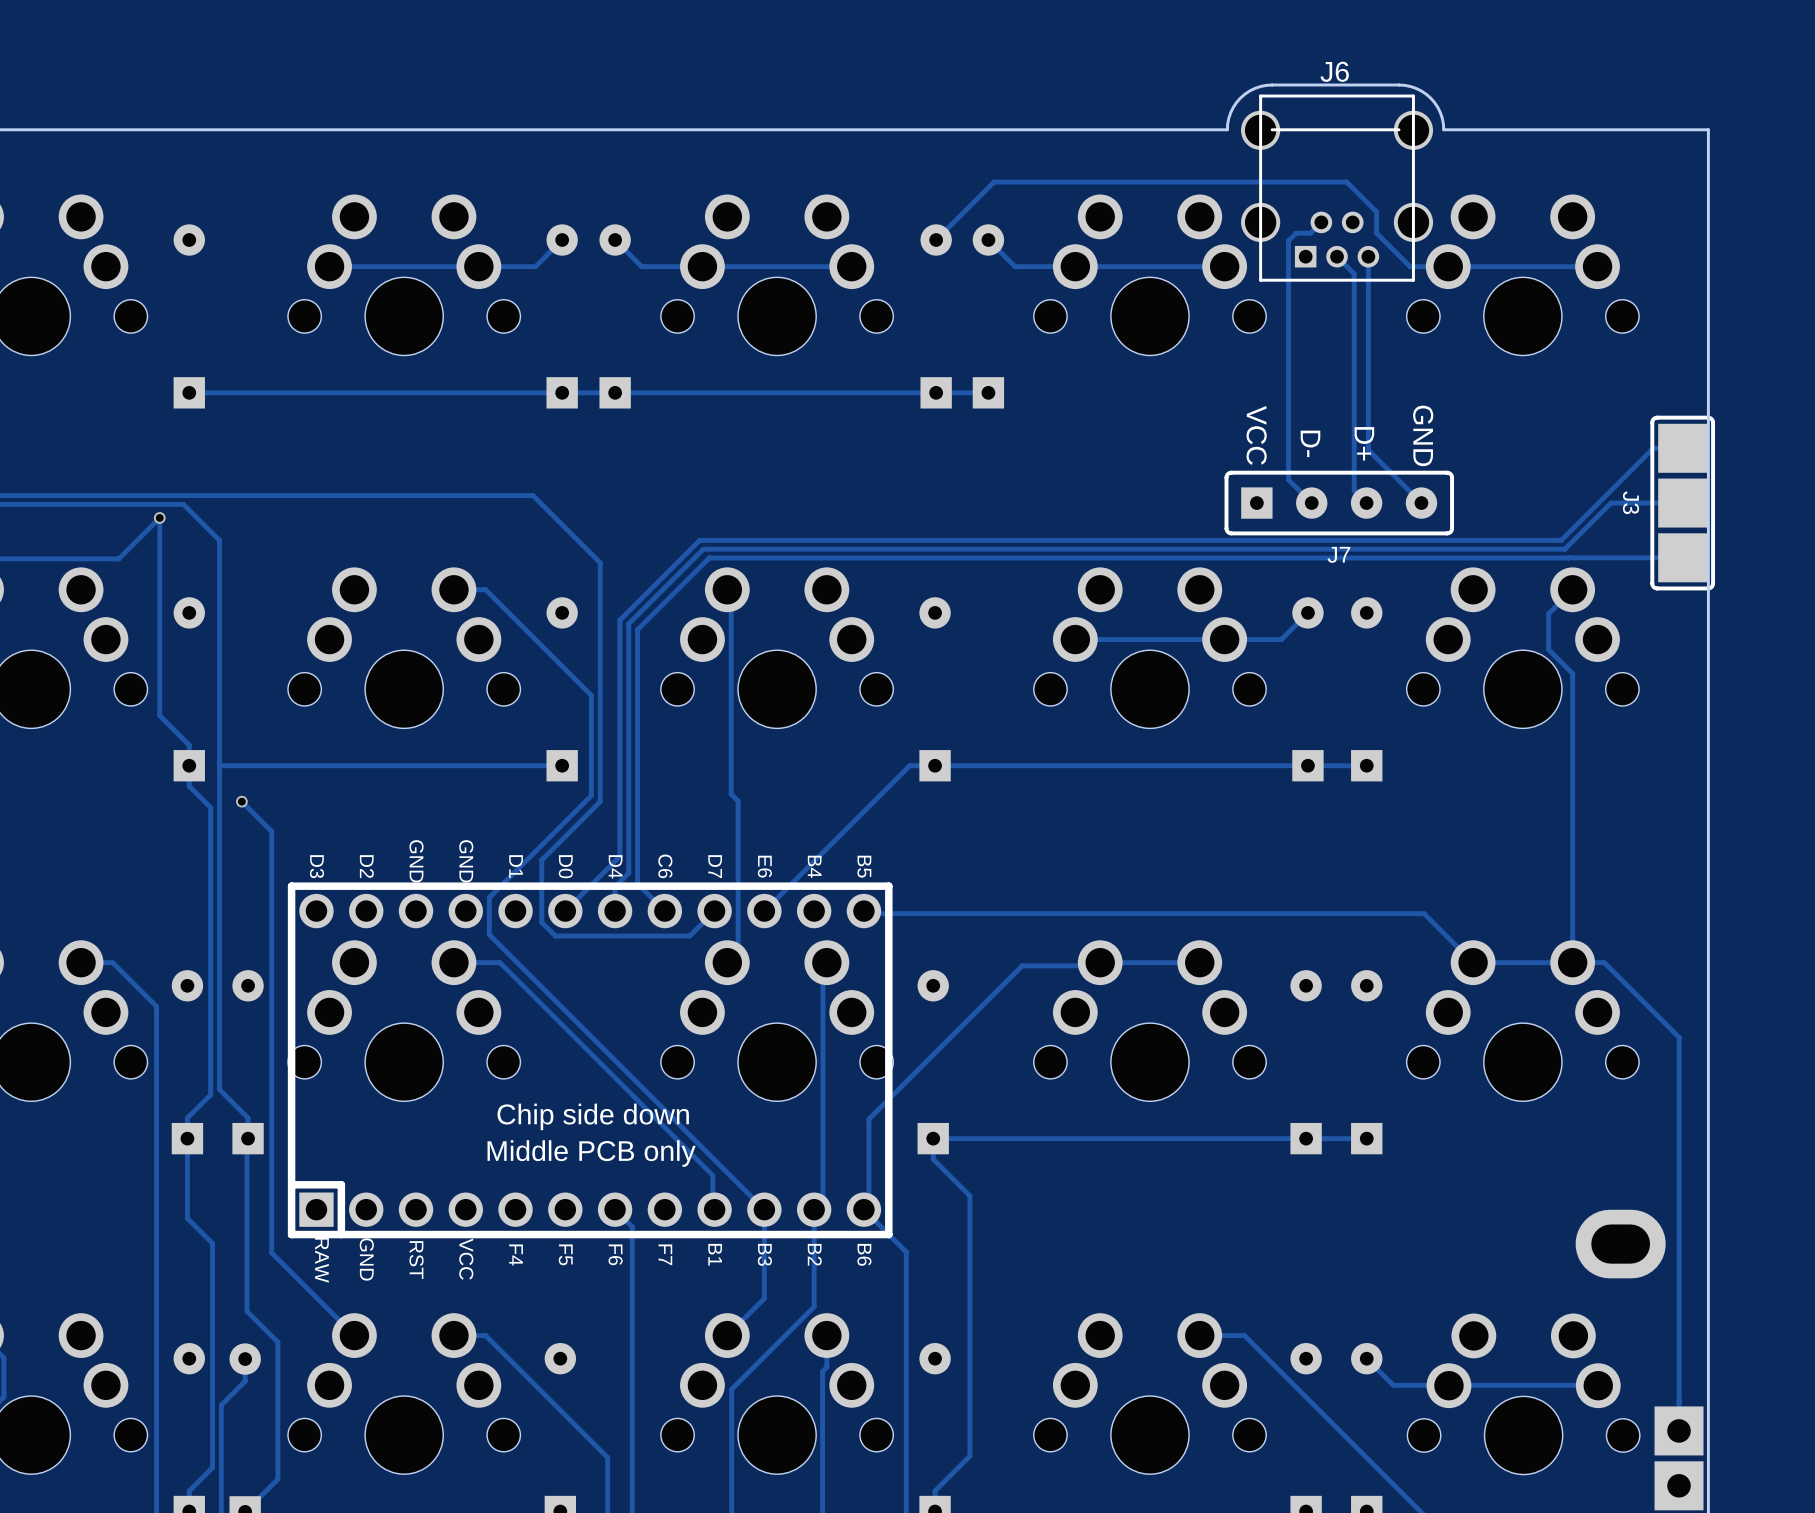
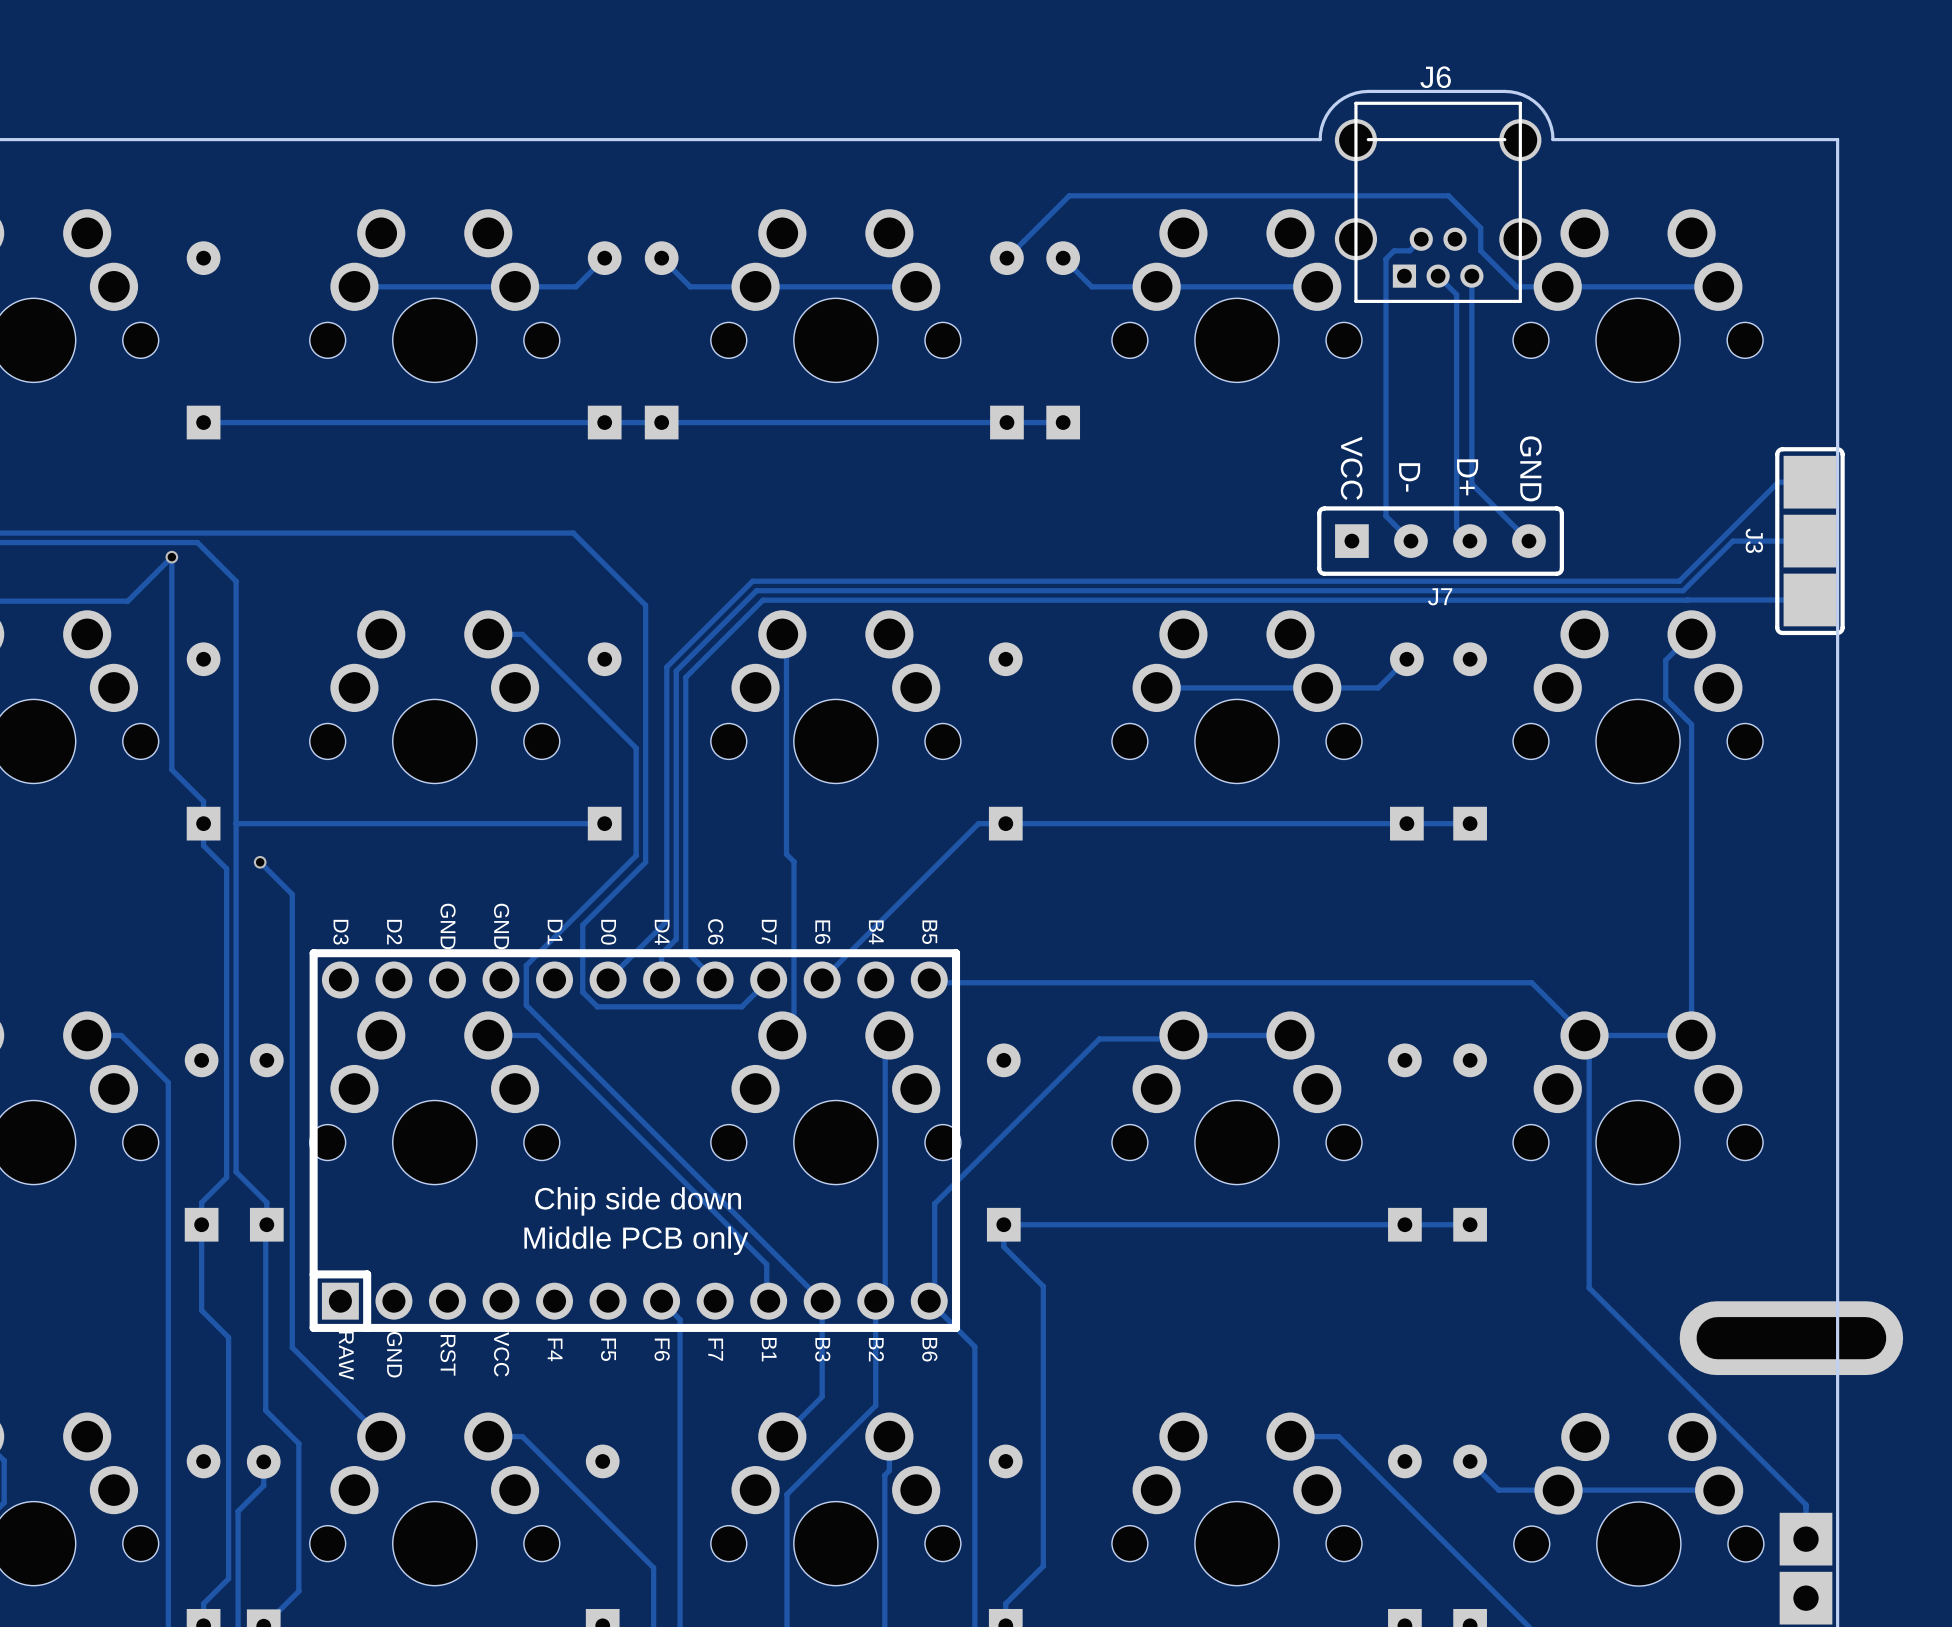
track: (1572, 962) (1604, 962) (1679, 1037) (1679, 1401) -> (1584, 1035) (1589, 1040) (1589, 1287) (1806, 1504) (1806, 1507)
part: (1620, 1244) -> none
part: none -> (1791, 1338)

